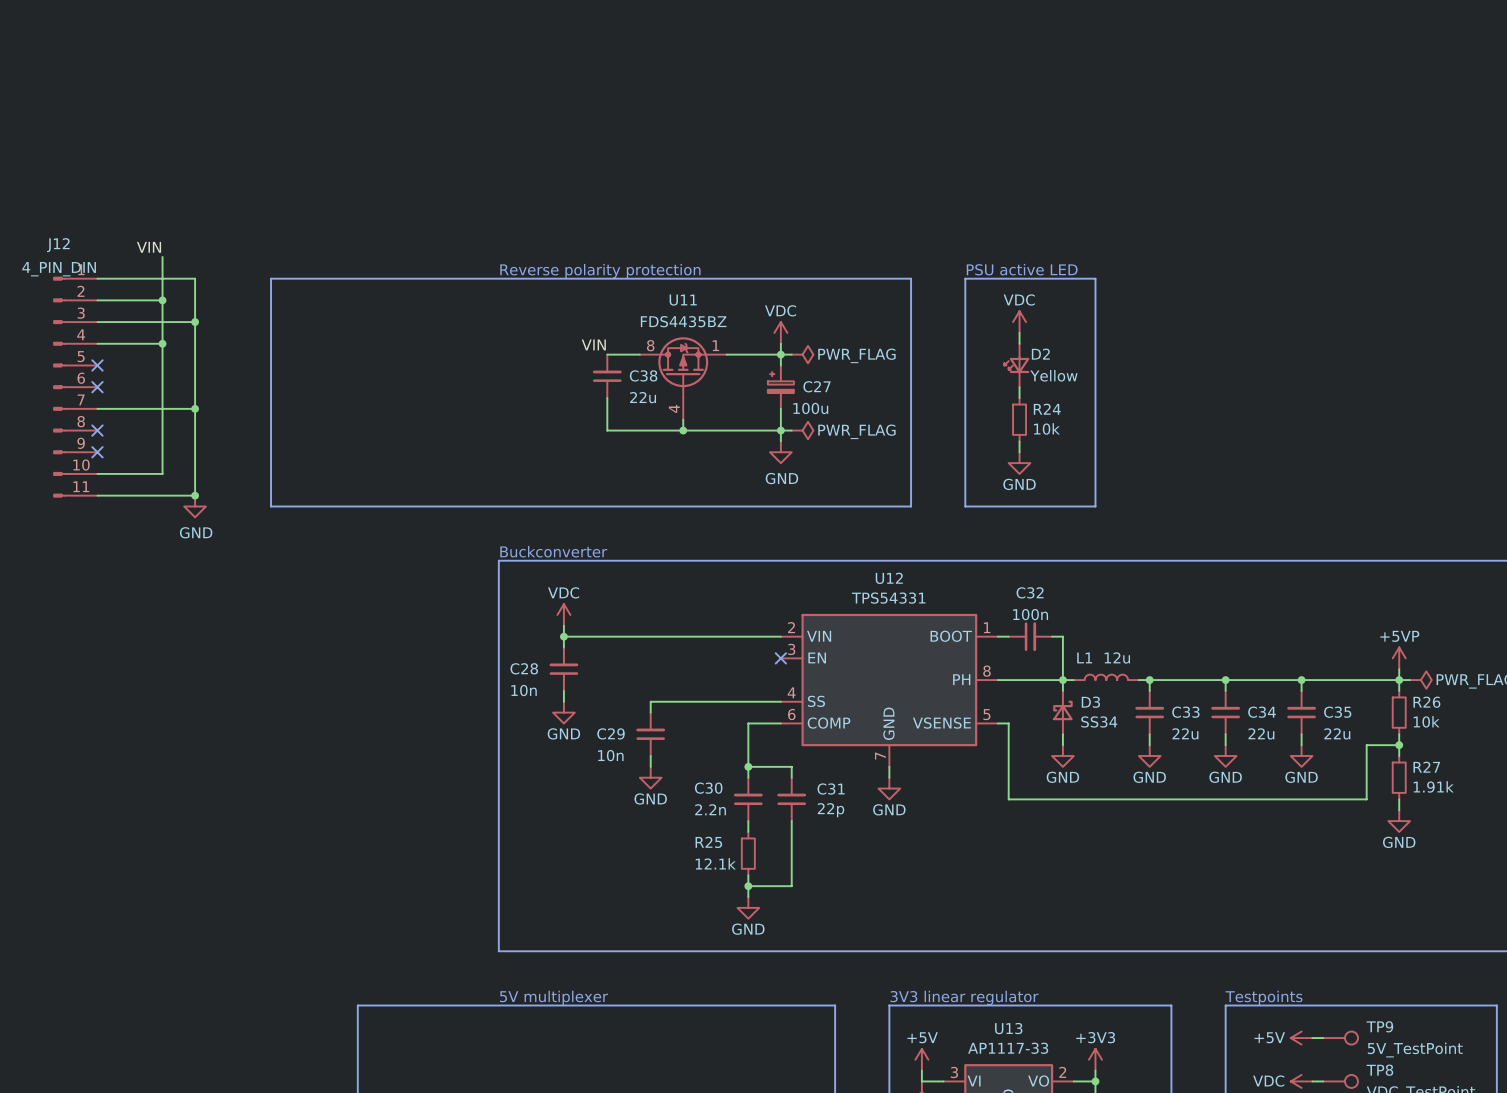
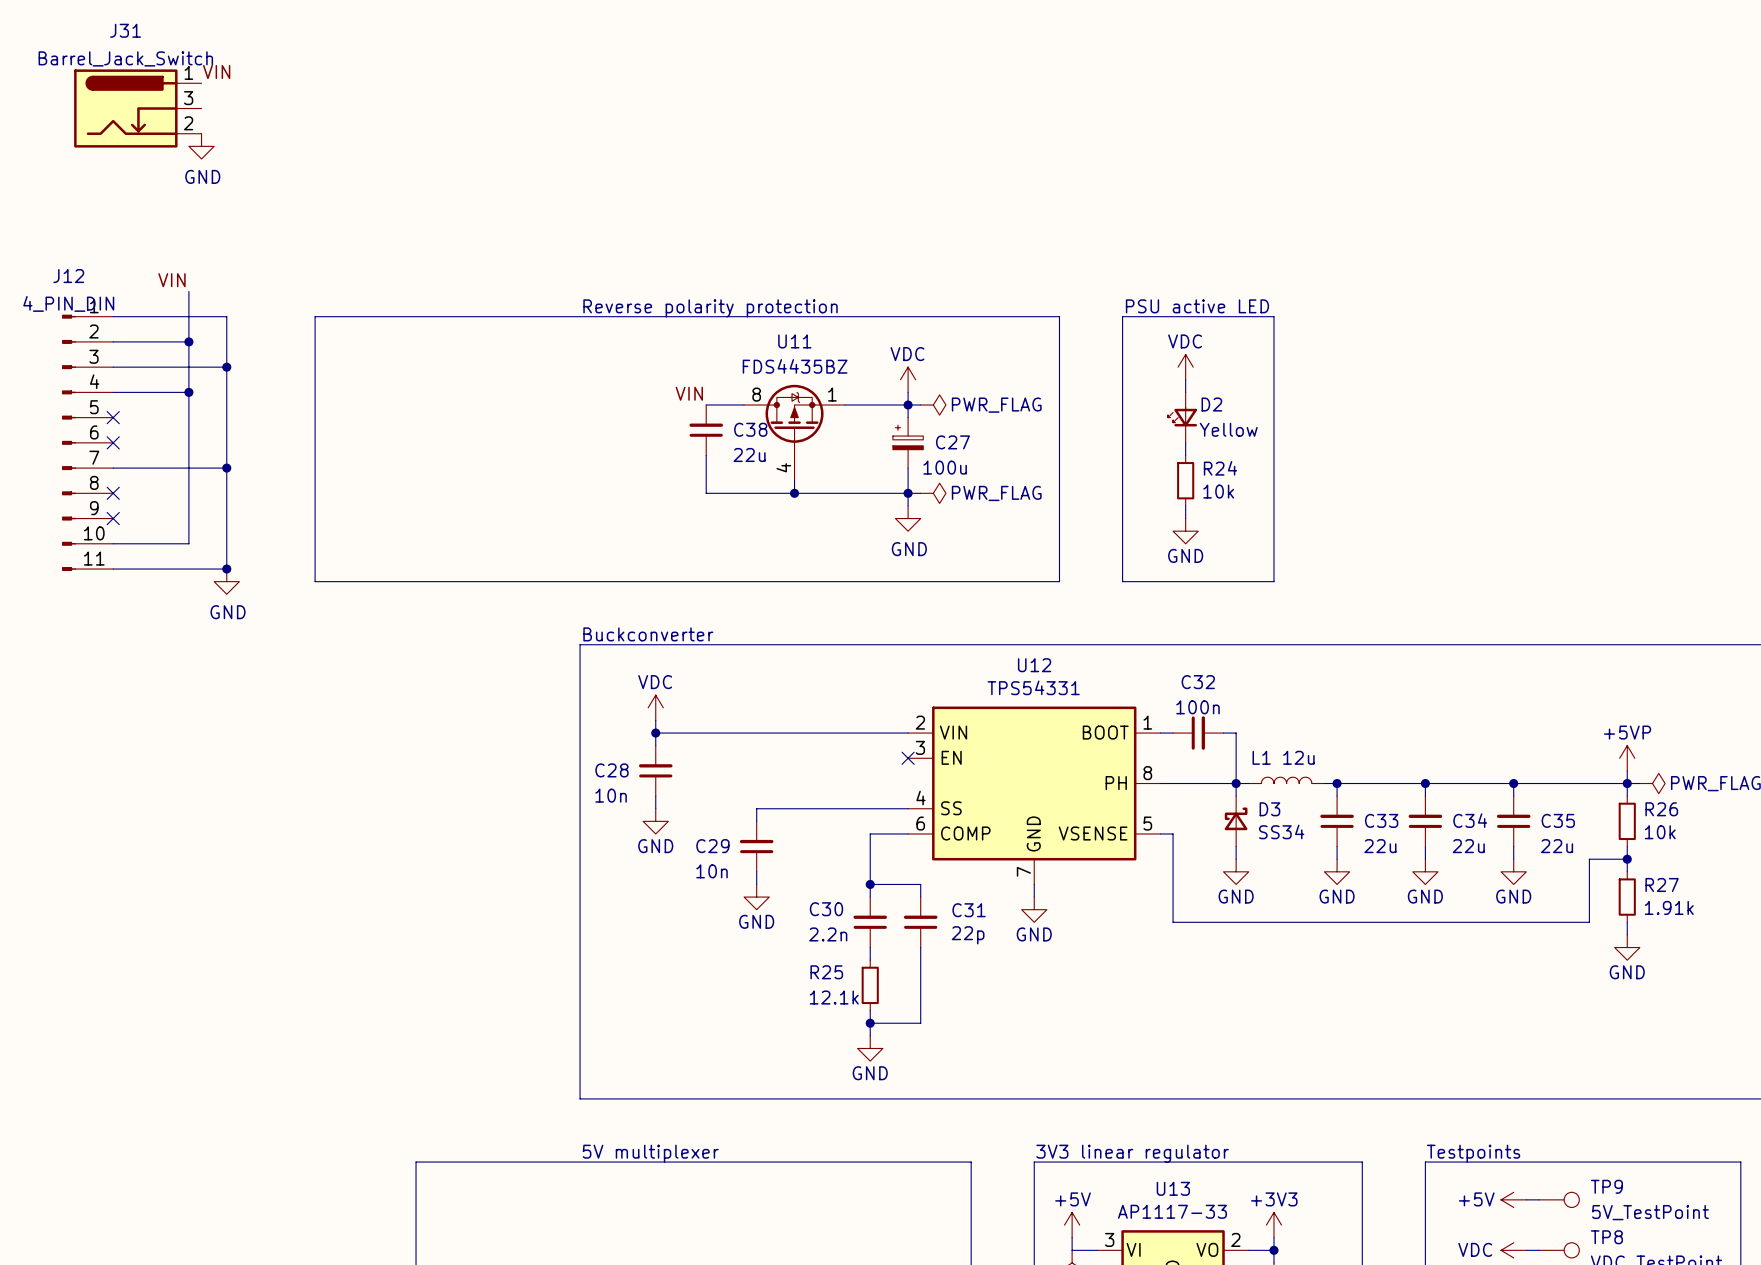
label: none -> VIN (216, 72)
J31: none -> Barrel_Jack_Switch (137, 108)
power symbol: none -> GND (201, 146)

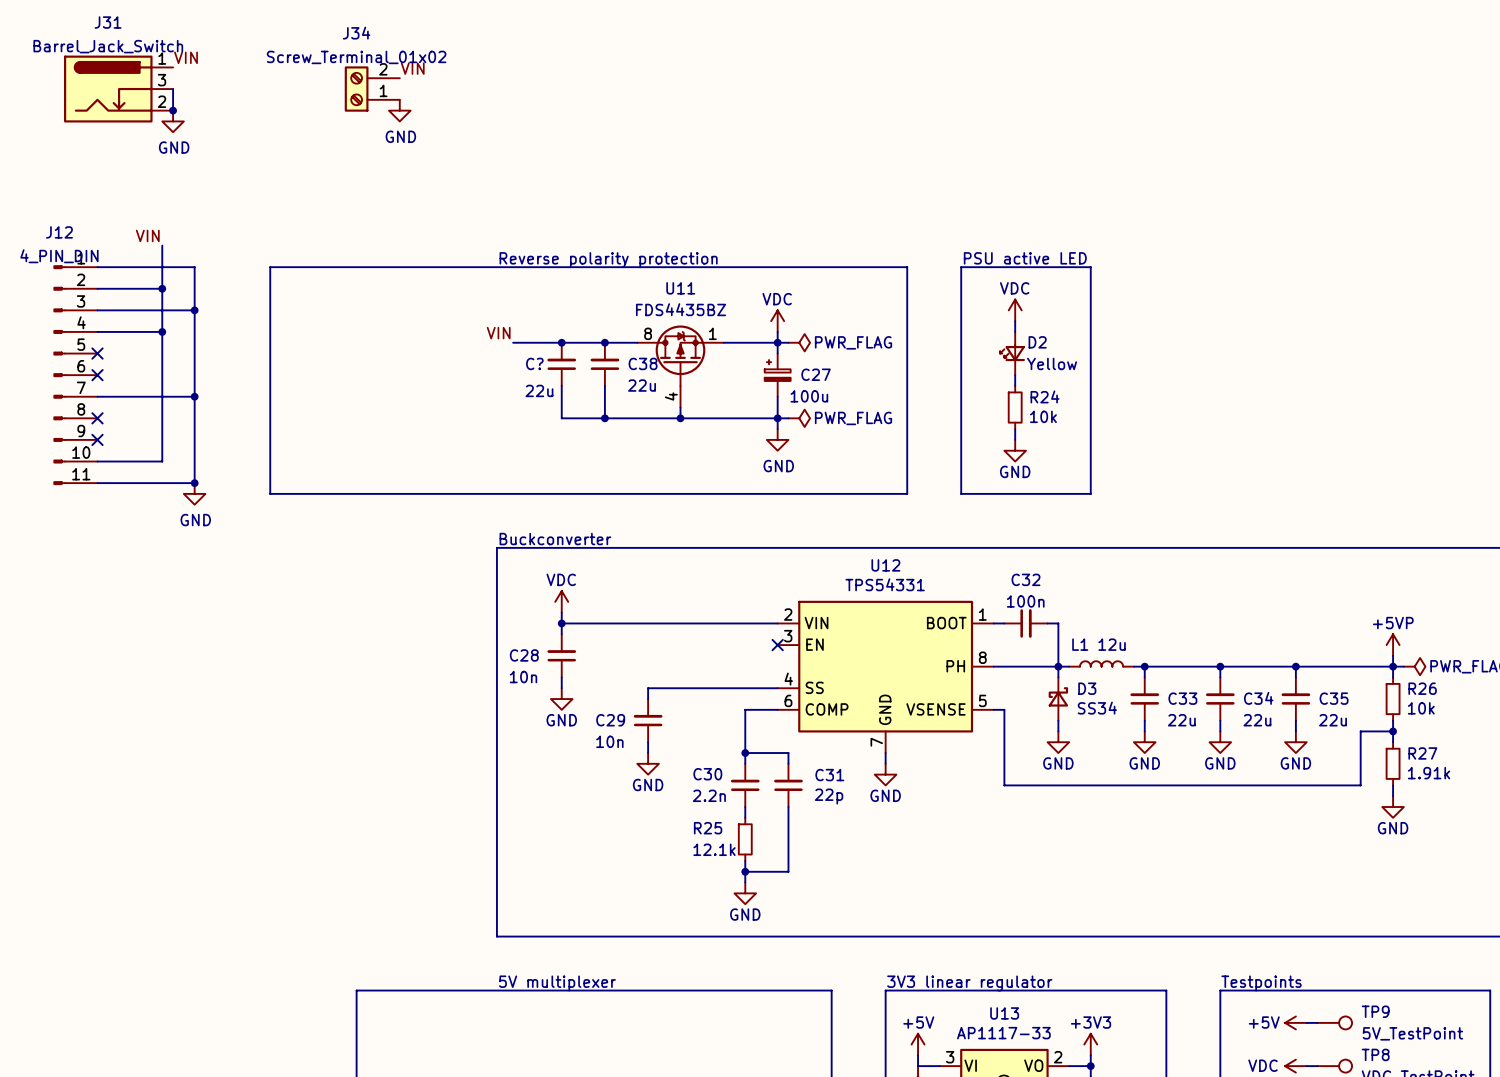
label: none -> VIN (412, 68)
wire: none -> (173, 89) (173, 110)
J34: none -> Screw_Terminal_01x02 (372, 89)
junction: none -> (173, 110)
power symbol: none -> GND (399, 110)
label position: VIN (689, 393) -> VIN (498, 333)
wire: none -> (513, 342) (604, 342)
junction: none -> (561, 342)
junction: none -> (604, 342)
C?: none -> 22u (561, 364)
wire: none -> (561, 385) (561, 418) (604, 418)
junction: none -> (604, 418)

